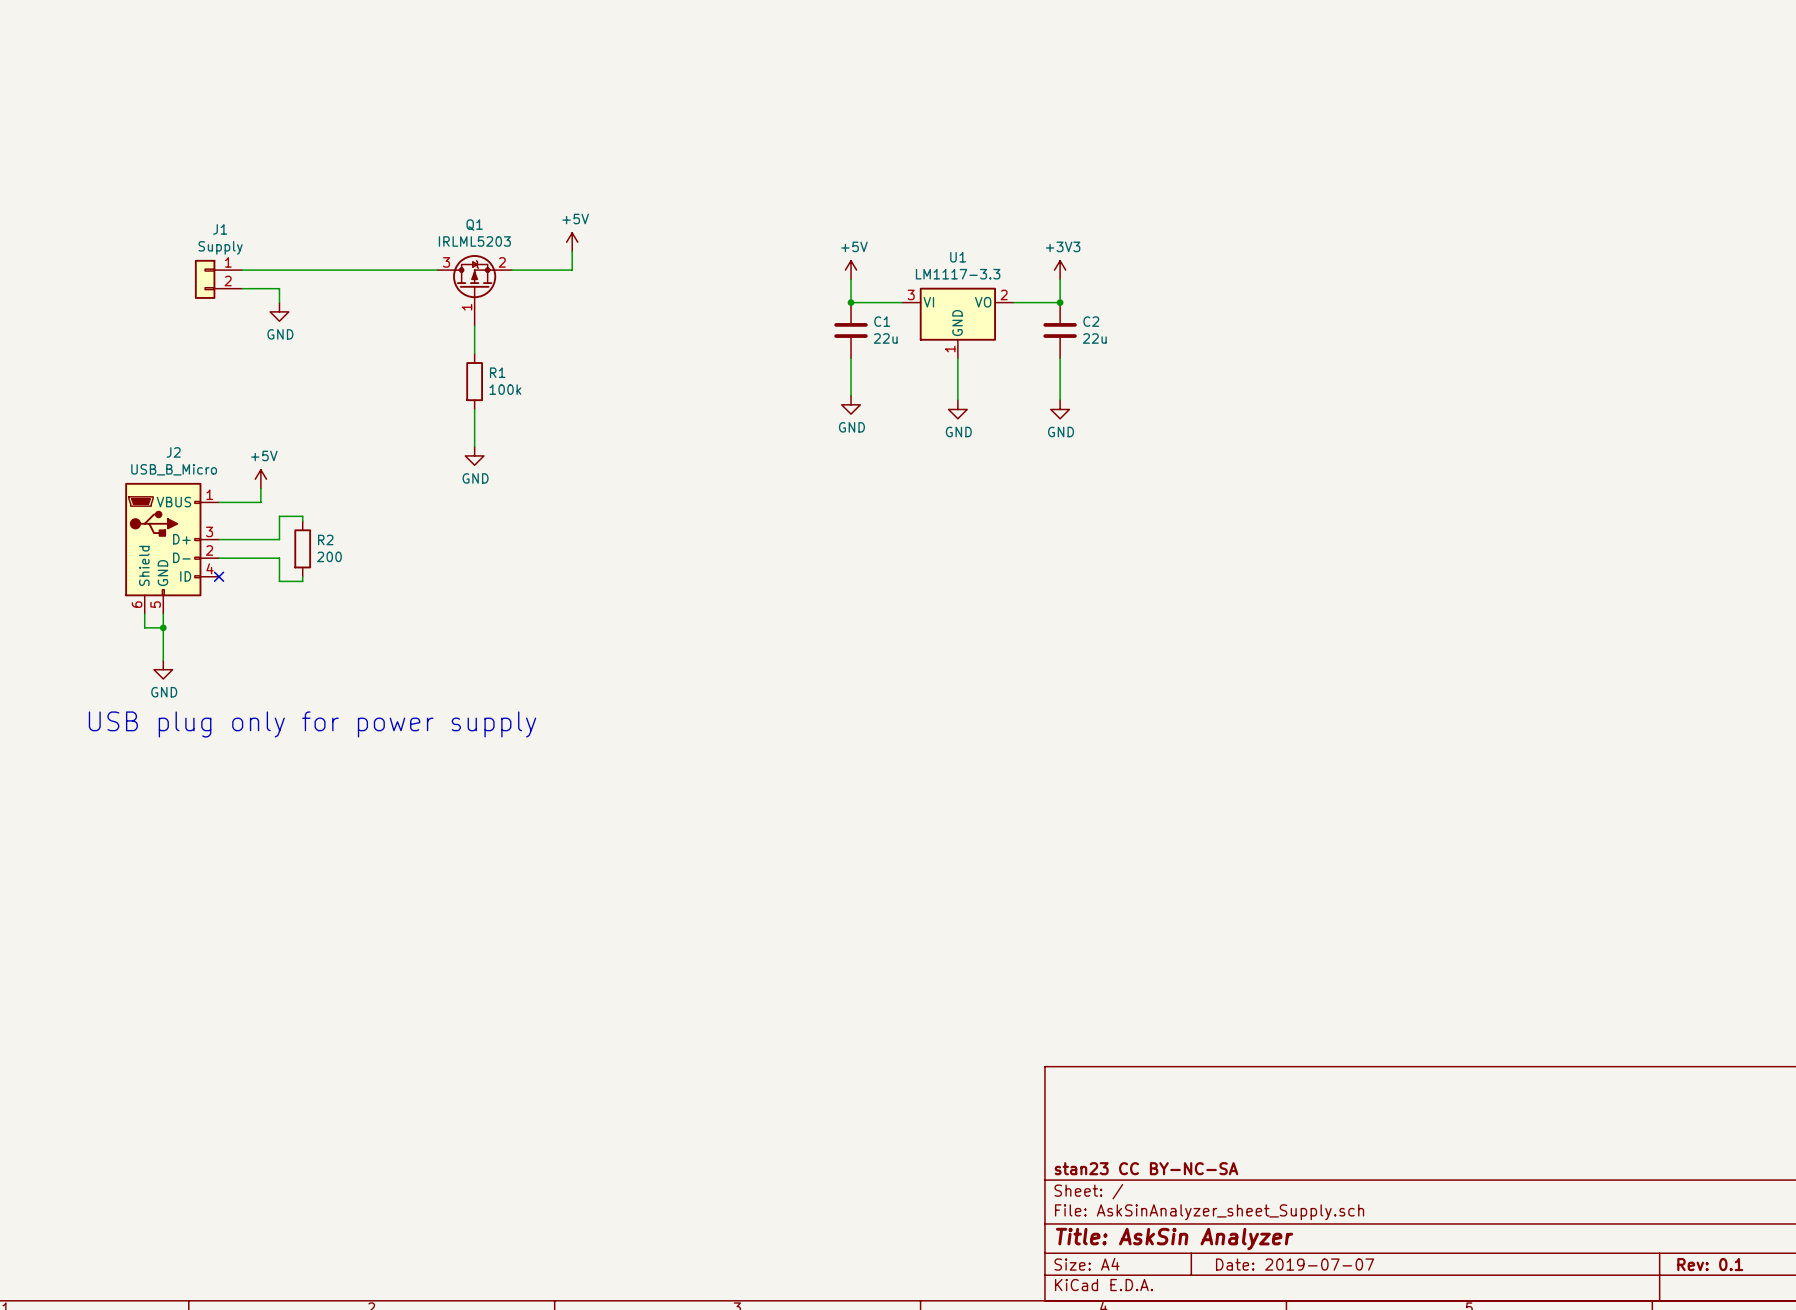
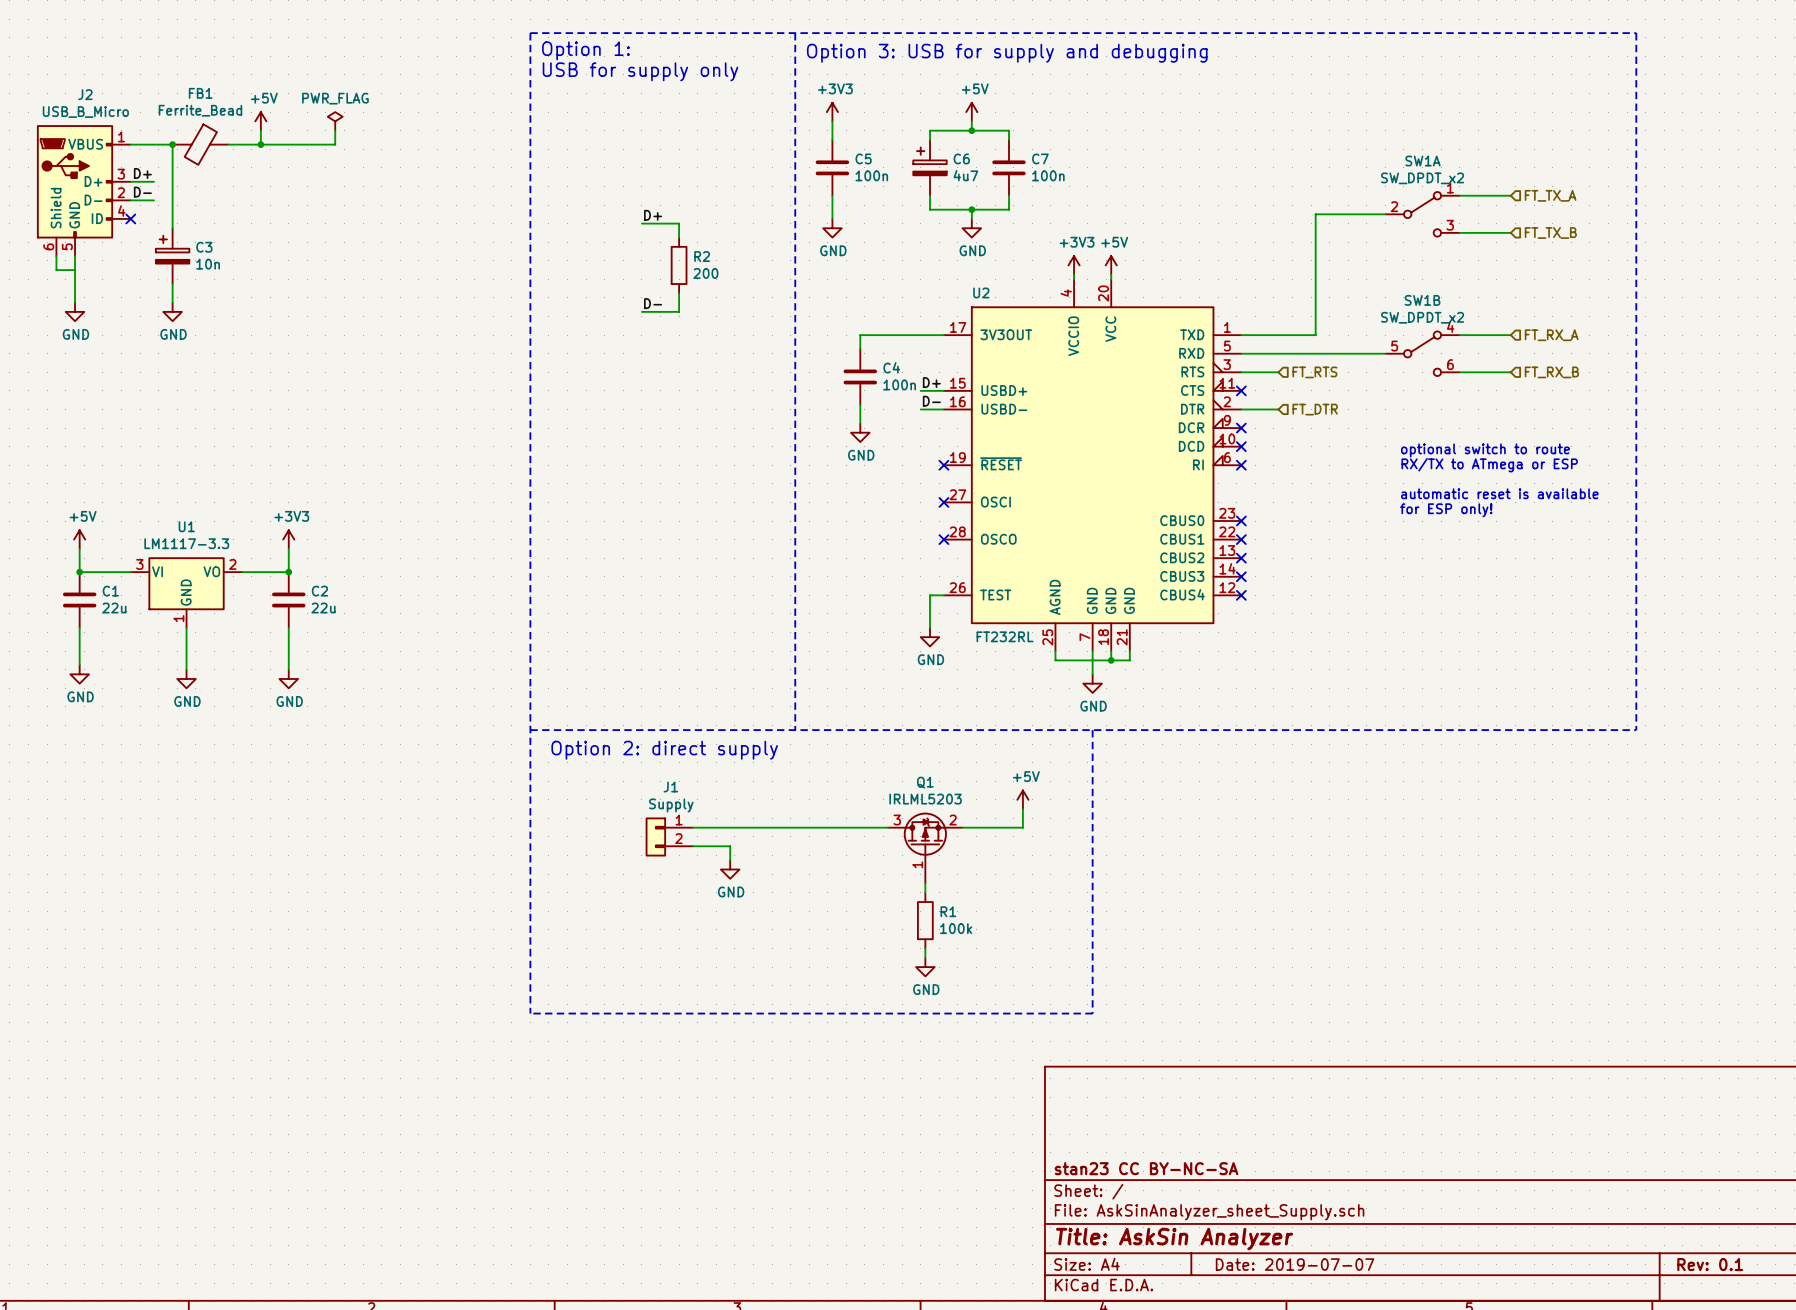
line: none -> (795, 33) (795, 730)
text: none -> Option 1: (585, 50)
text: none -> Option 3: USB for supply and debugging (1007, 53)
text: none -> USB for supply only (640, 71)
power symbol: none -> +3V3 (832, 112)
power symbol: none -> +5V (971, 112)
power symbol: none -> +5V (260, 121)
power symbol: none -> PWR_FLAG (335, 121)
wire: none -> (832, 121) (832, 139)
wire: none -> (971, 121) (971, 130)
wire: none -> (260, 130) (260, 144)
wire: none -> (335, 130) (335, 144) (228, 144)
junction: none -> (971, 130)
wire: none -> (930, 139) (930, 130) (1008, 130) (1008, 139)
wire: none -> (130, 144) (172, 144) (172, 228)
junction: none -> (172, 144)
FB1: none -> Ferrite_Bead (200, 144)
junction: none -> (260, 144)
C5: none -> 100n (832, 167)
C6: none -> 4u7 (930, 167)
C7: none -> 100n (1008, 167)
label: none -> D+ (142, 173)
wire: none -> (130, 181) (154, 181)
label: none -> D- (142, 192)
wire: none -> (832, 195) (832, 218)
wire: none -> (930, 195) (930, 209) (1008, 209) (1008, 195)
wire: none -> (1459, 195) (1510, 195)
hierarchical label: none -> FT_TX_A (1550, 195)
wire: none -> (130, 200) (154, 200)
wire: none -> (971, 209) (971, 218)
junction: none -> (971, 209)
wire: none -> (1385, 214) (1315, 214) (1315, 335) (1241, 335)
SW1A: none -> SW_DPDT_x2 (1422, 214)
label: none -> D+ (653, 215)
no-connect mark: none -> (130, 218)
wire: none -> (641, 223) (679, 223) (679, 237)
power symbol: none -> GND (832, 228)
power symbol: none -> GND (971, 228)
wire: none -> (1459, 232) (1510, 232)
hierarchical label: none -> FT_TX_B (1550, 233)
power symbol: +5V (572, 242) -> none
wire: (572, 251) (572, 270) (511, 270) -> none
wire: none -> (56, 256) (56, 270) (75, 270)
wire: none -> (75, 256) (75, 302)
C3: none -> 10n (172, 256)
power symbol: none -> +5V (1111, 265)
wire: (242, 270) (437, 270) -> none
power symbol: +5V (851, 270) -> none
power symbol position: +3V3 (1060, 270) -> +3V3 (1074, 265)
wire: none -> (1074, 274) (1074, 279)
wire: none -> (1111, 274) (1111, 279)
J1 position: (218, 279) -> (669, 836)
wire: (851, 279) (851, 302) (902, 302) -> none
wire: (1060, 279) (1060, 302) (1013, 302) -> none
wire: none -> (172, 284) (172, 302)
wire: (242, 288) (279, 288) (279, 302) -> none
Q1 position: (474, 290) -> (925, 848)
wire: none -> (679, 293) (679, 311) (641, 311)
junction: (851, 302) -> none
junction: (1060, 302) -> none
label: none -> D- (653, 303)
power symbol: none -> GND (75, 311)
power symbol: none -> GND (172, 311)
power symbol: GND (279, 311) -> none
U1 position: (957, 323) -> (186, 592)
wire: (474, 325) (474, 353) -> none
C1 position: (851, 330) -> (79, 599)
C2 position: (1060, 330) -> (288, 599)
wire: none -> (943, 335) (860, 335) (860, 349)
wire: none -> (1459, 335) (1510, 335)
hierarchical label: none -> FT_RX_A (1551, 335)
wire: none -> (1241, 353) (1385, 353)
SW1B: none -> SW_DPDT_x2 (1422, 353)
wire: (851, 358) (851, 395) -> none
wire: (957, 358) (957, 400) -> none
wire: none -> (1241, 372) (1278, 372)
hierarchical label: none -> FT_RTS (1314, 372)
wire: none -> (1459, 372) (1510, 372)
hierarchical label: none -> FT_RX_B (1551, 372)
C4: none -> 100n (860, 376)
R1 position: (474, 381) -> (925, 920)
label: none -> D+ (931, 382)
wire: none -> (920, 390) (943, 390)
no-connect mark: none -> (1241, 390)
label: none -> D- (931, 401)
power symbol position: GND (851, 404) -> GND (860, 432)
wire: none -> (860, 404) (860, 423)
wire: (474, 409) (474, 446) -> none
wire: none -> (920, 409) (943, 409)
power symbol: GND (957, 409) -> none
power symbol: GND (1060, 409) -> none
wire: none -> (1241, 409) (1278, 409)
hierarchical label: none -> FT_DTR (1315, 409)
no-connect mark: none -> (1241, 428)
no-connect mark: none -> (1241, 446)
text: none -> optional switch to route (1485, 450)
power symbol: GND (474, 455) -> none
no-connect mark: none -> (943, 465)
U2: none -> FT232RL (1092, 465)
no-connect mark: none -> (1241, 465)
text: none -> RX/TX to ATmega or ESP (1489, 465)
power symbol: +5V (260, 479) -> none
wire: (260, 488) (260, 502) (219, 502) -> none
text: none -> automatic reset is available (1499, 493)
no-connect mark: none -> (943, 502)
text: none -> for ESP only! (1446, 510)
wire: (302, 521) (302, 516) (279, 516) (279, 539) (219, 539) -> none
no-connect mark: none -> (1241, 521)
power symbol: none -> +5V (79, 539)
power symbol: none -> +3V3 (288, 539)
no-connect mark: none -> (943, 539)
no-connect mark: none -> (1241, 539)
wire: none -> (79, 548) (79, 572) (130, 572)
J2 position: (172, 548) -> (83, 190)
wire: none -> (288, 548) (288, 572) (242, 572)
R2 position: (302, 548) -> (679, 265)
wire: (219, 558) (279, 558) (279, 581) (302, 581) (302, 576) -> none
no-connect mark: none -> (1241, 558)
junction: none -> (79, 572)
junction: none -> (288, 572)
no-connect mark: (219, 576) -> none
no-connect mark: none -> (1241, 576)
wire: none -> (943, 595) (930, 595) (930, 627)
no-connect mark: none -> (1241, 595)
wire: (144, 613) (144, 627) (163, 627) -> none
wire: (163, 613) (163, 660) -> none
wire: none -> (79, 627) (79, 665)
junction: (163, 627) -> none
wire: none -> (186, 627) (186, 669)
wire: none -> (288, 627) (288, 669)
power symbol: none -> GND (930, 637)
wire: none -> (1055, 651) (1055, 660) (1129, 660) (1129, 651)
wire: none -> (1092, 651) (1092, 674)
wire: none -> (1111, 651) (1111, 660)
junction: none -> (1111, 660)
power symbol position: GND (163, 669) -> GND (186, 678)
power symbol: none -> GND (79, 674)
power symbol: none -> GND (288, 678)
power symbol: none -> GND (1092, 683)
text: USB plug only for power supply (312, 724) -> none
line: none -> (530, 730) (1636, 730) (1636, 33) (530, 33) (530, 1013) (1092, 1013) (1092, 730)
text: none -> Option 2: direct supply (664, 750)
power symbol: none -> +5V (1022, 799)
wire: none -> (1022, 809) (1022, 827) (962, 827)
wire: none -> (693, 827) (888, 827)
wire: none -> (693, 846) (730, 846) (730, 860)
power symbol: none -> GND (730, 869)
wire: none -> (925, 883) (925, 892)
wire: none -> (925, 948) (925, 957)
power symbol: none -> GND (925, 967)

